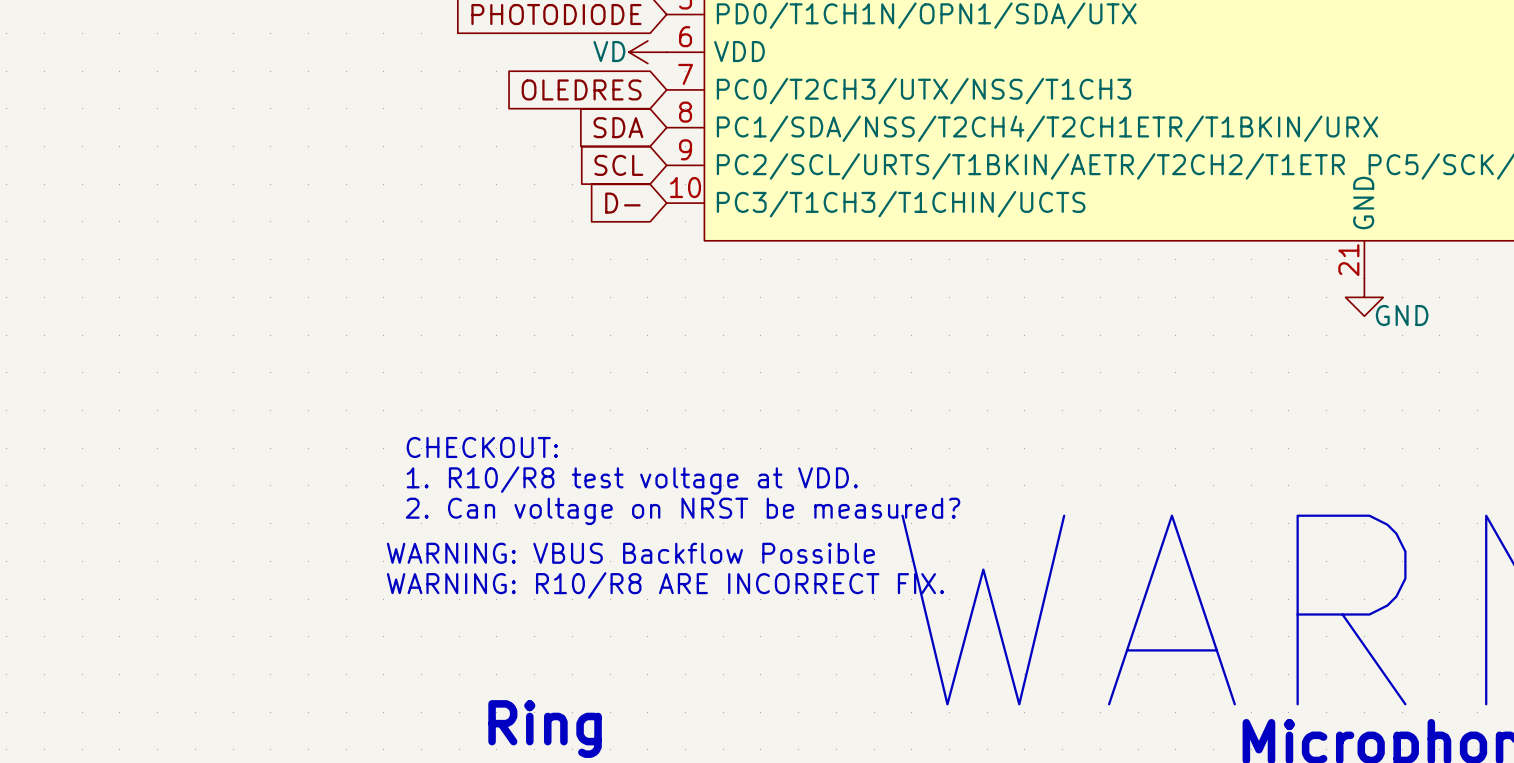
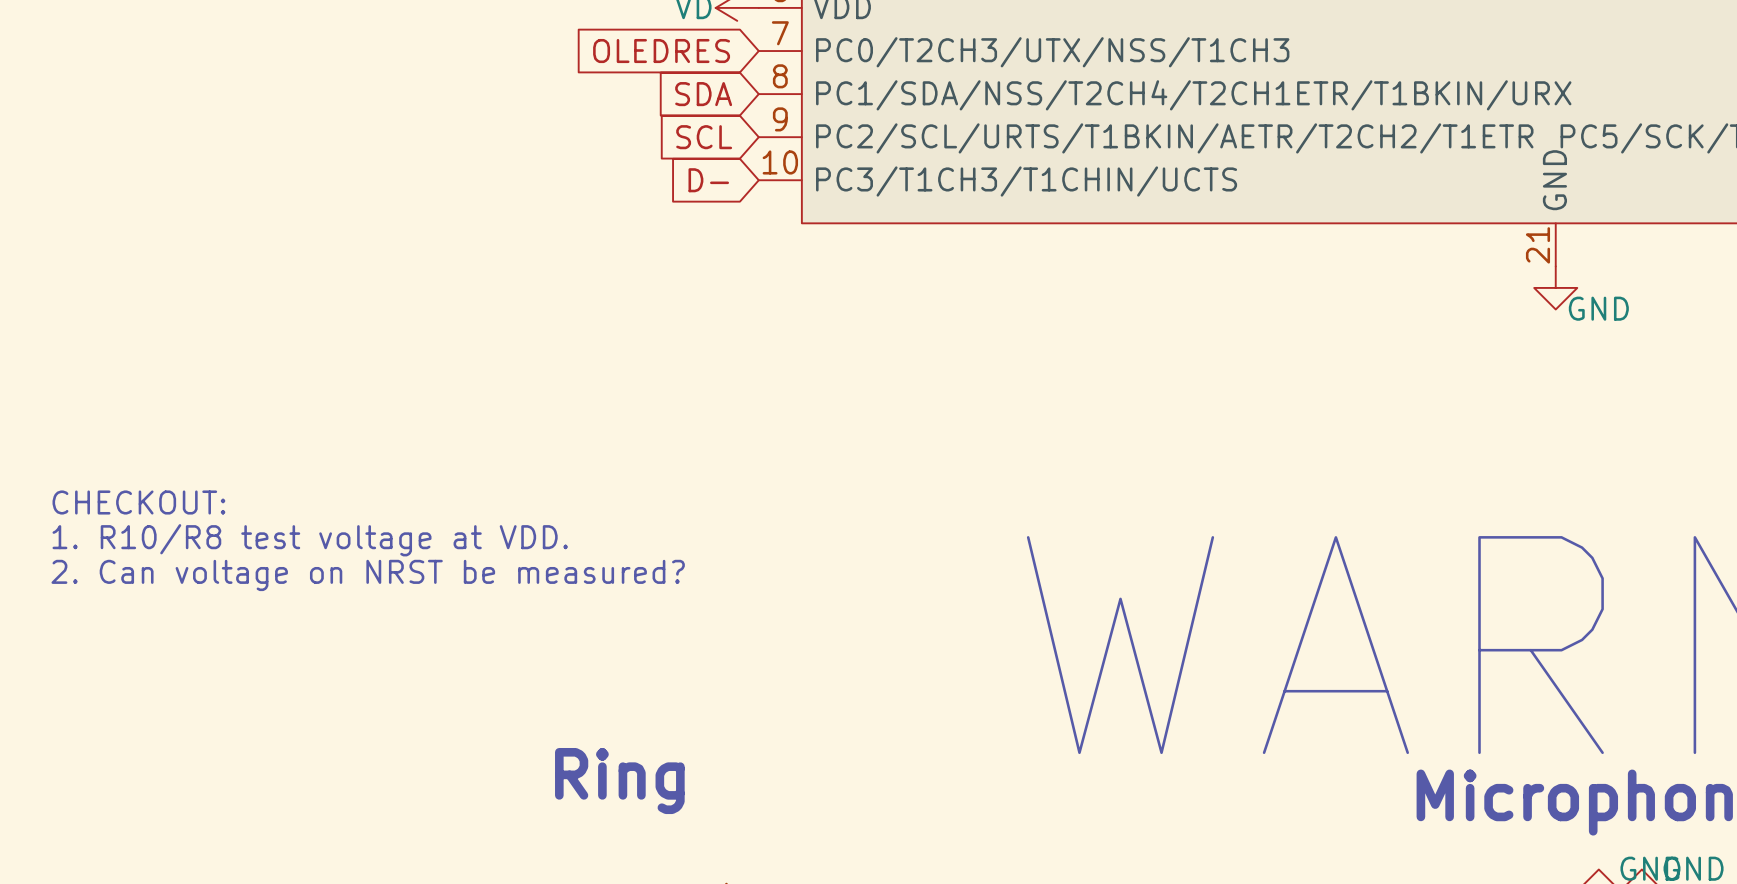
text position: CHECKOUT: (482, 447) -> CHECKOUT: (138, 502)
text position: 1. R10/R8 test voltage at VDD. (632, 480) -> 1. R10/R8 test voltage at VDD. (310, 540)
text position: 2. Can voltage on NRST be measured? (683, 511) -> 2. Can voltage on NRST be measured? (368, 575)
text: WARNING: VBUS Backflow Possible (630, 553) -> none
text: WARNING: R10/R8 ARE INCORRECT FIX. (665, 585) -> none

